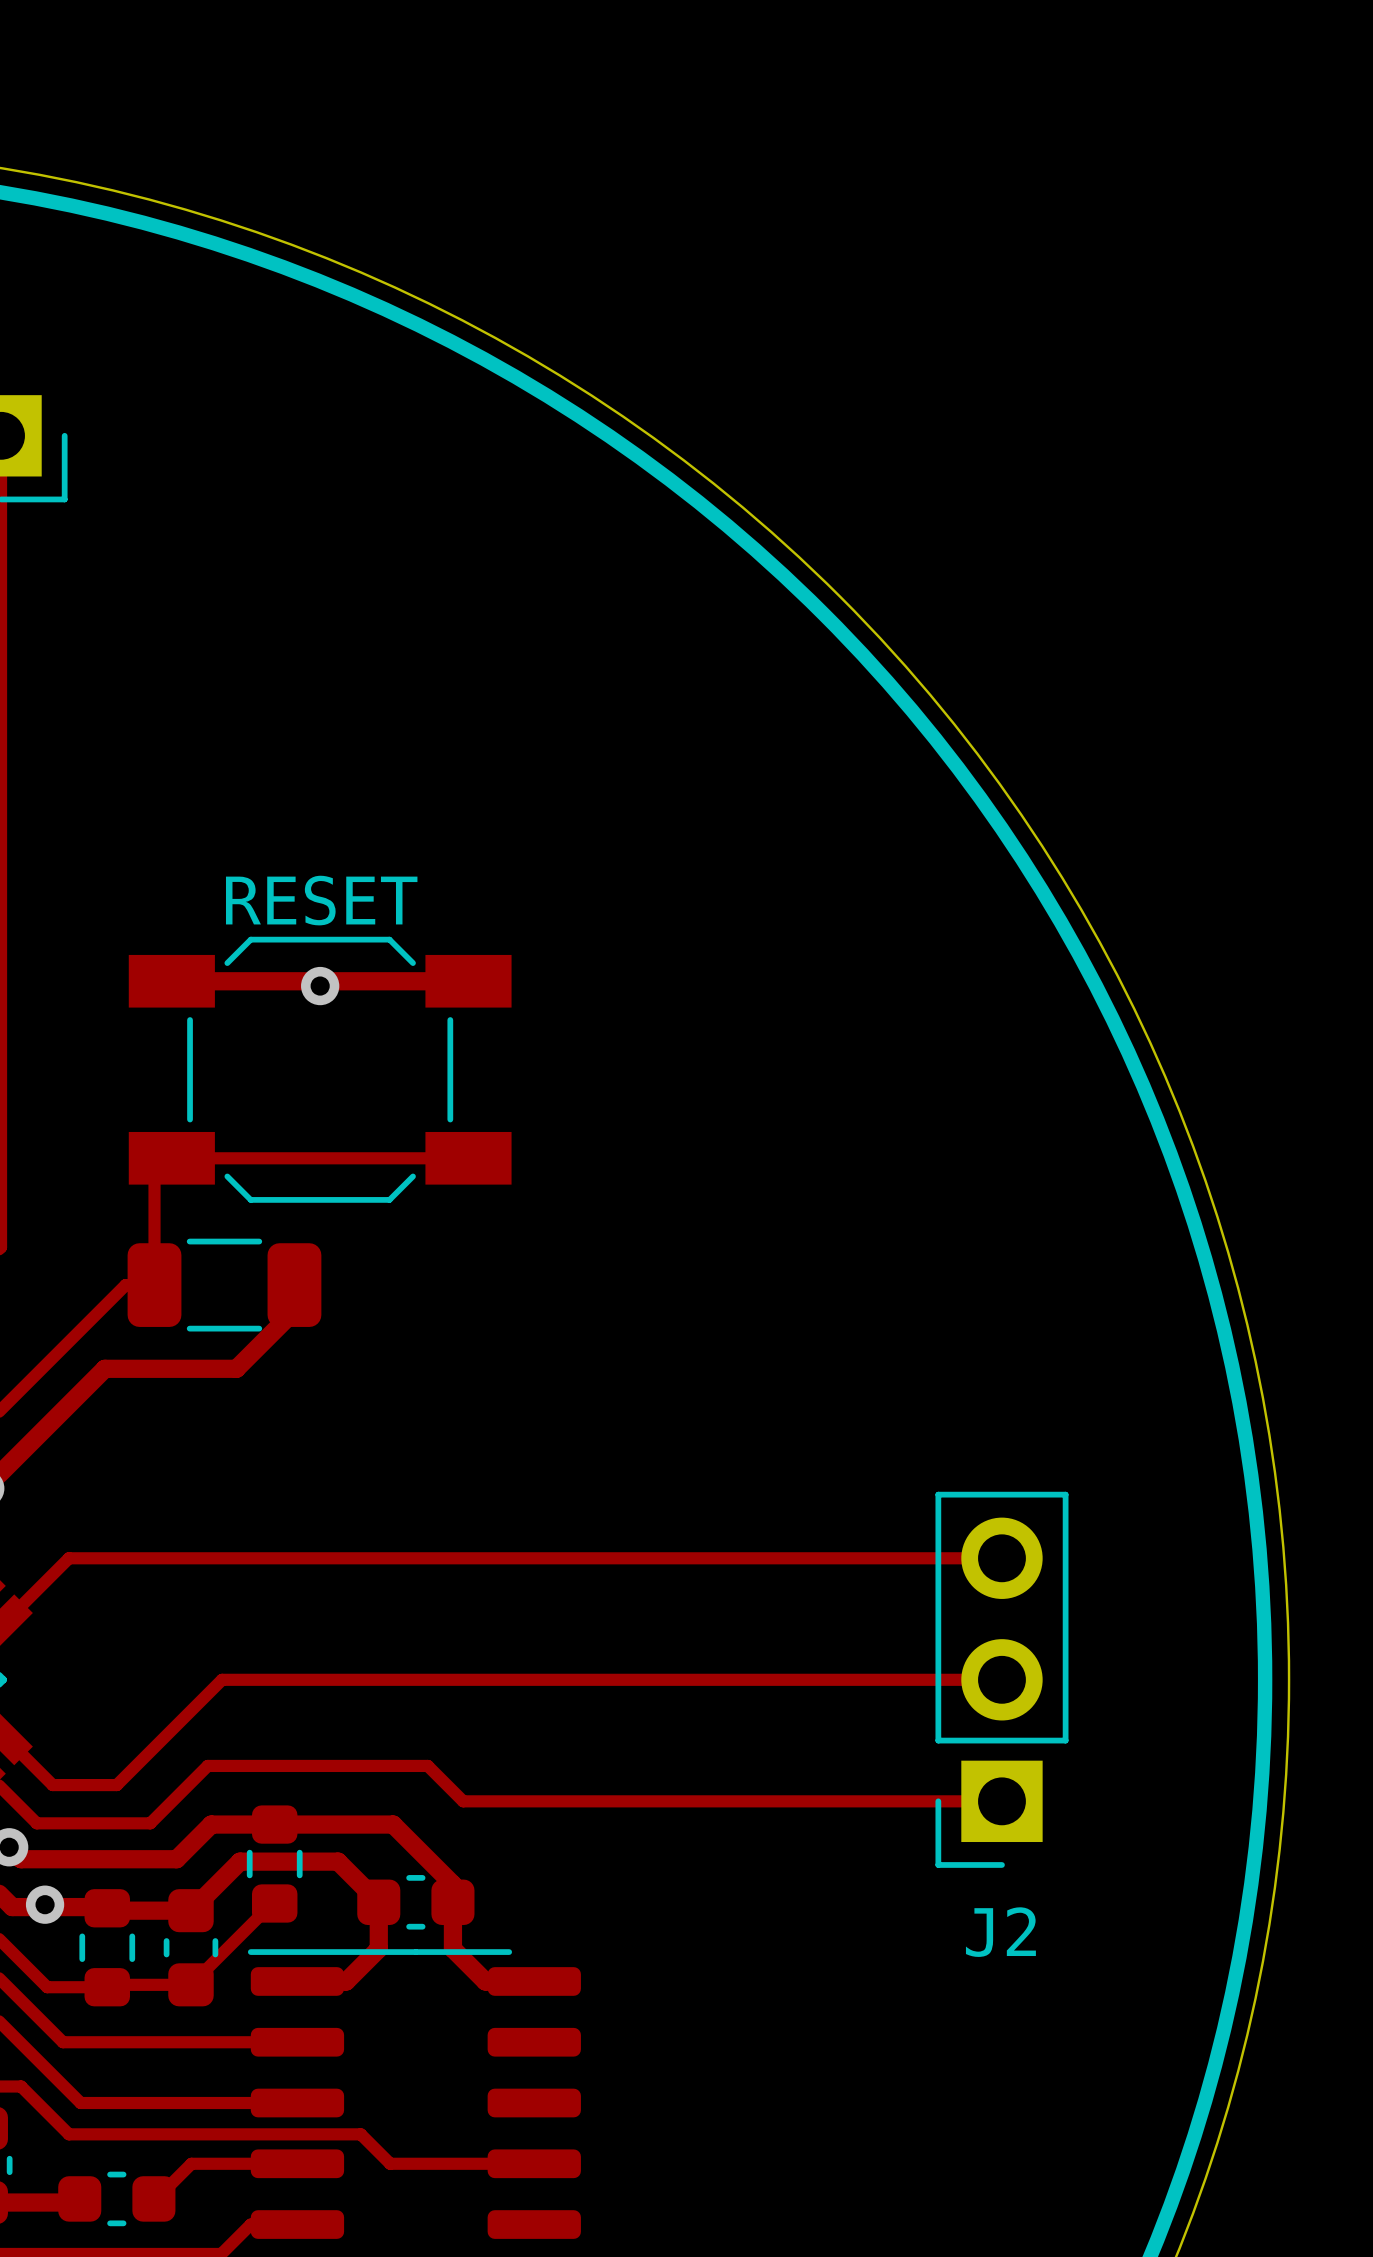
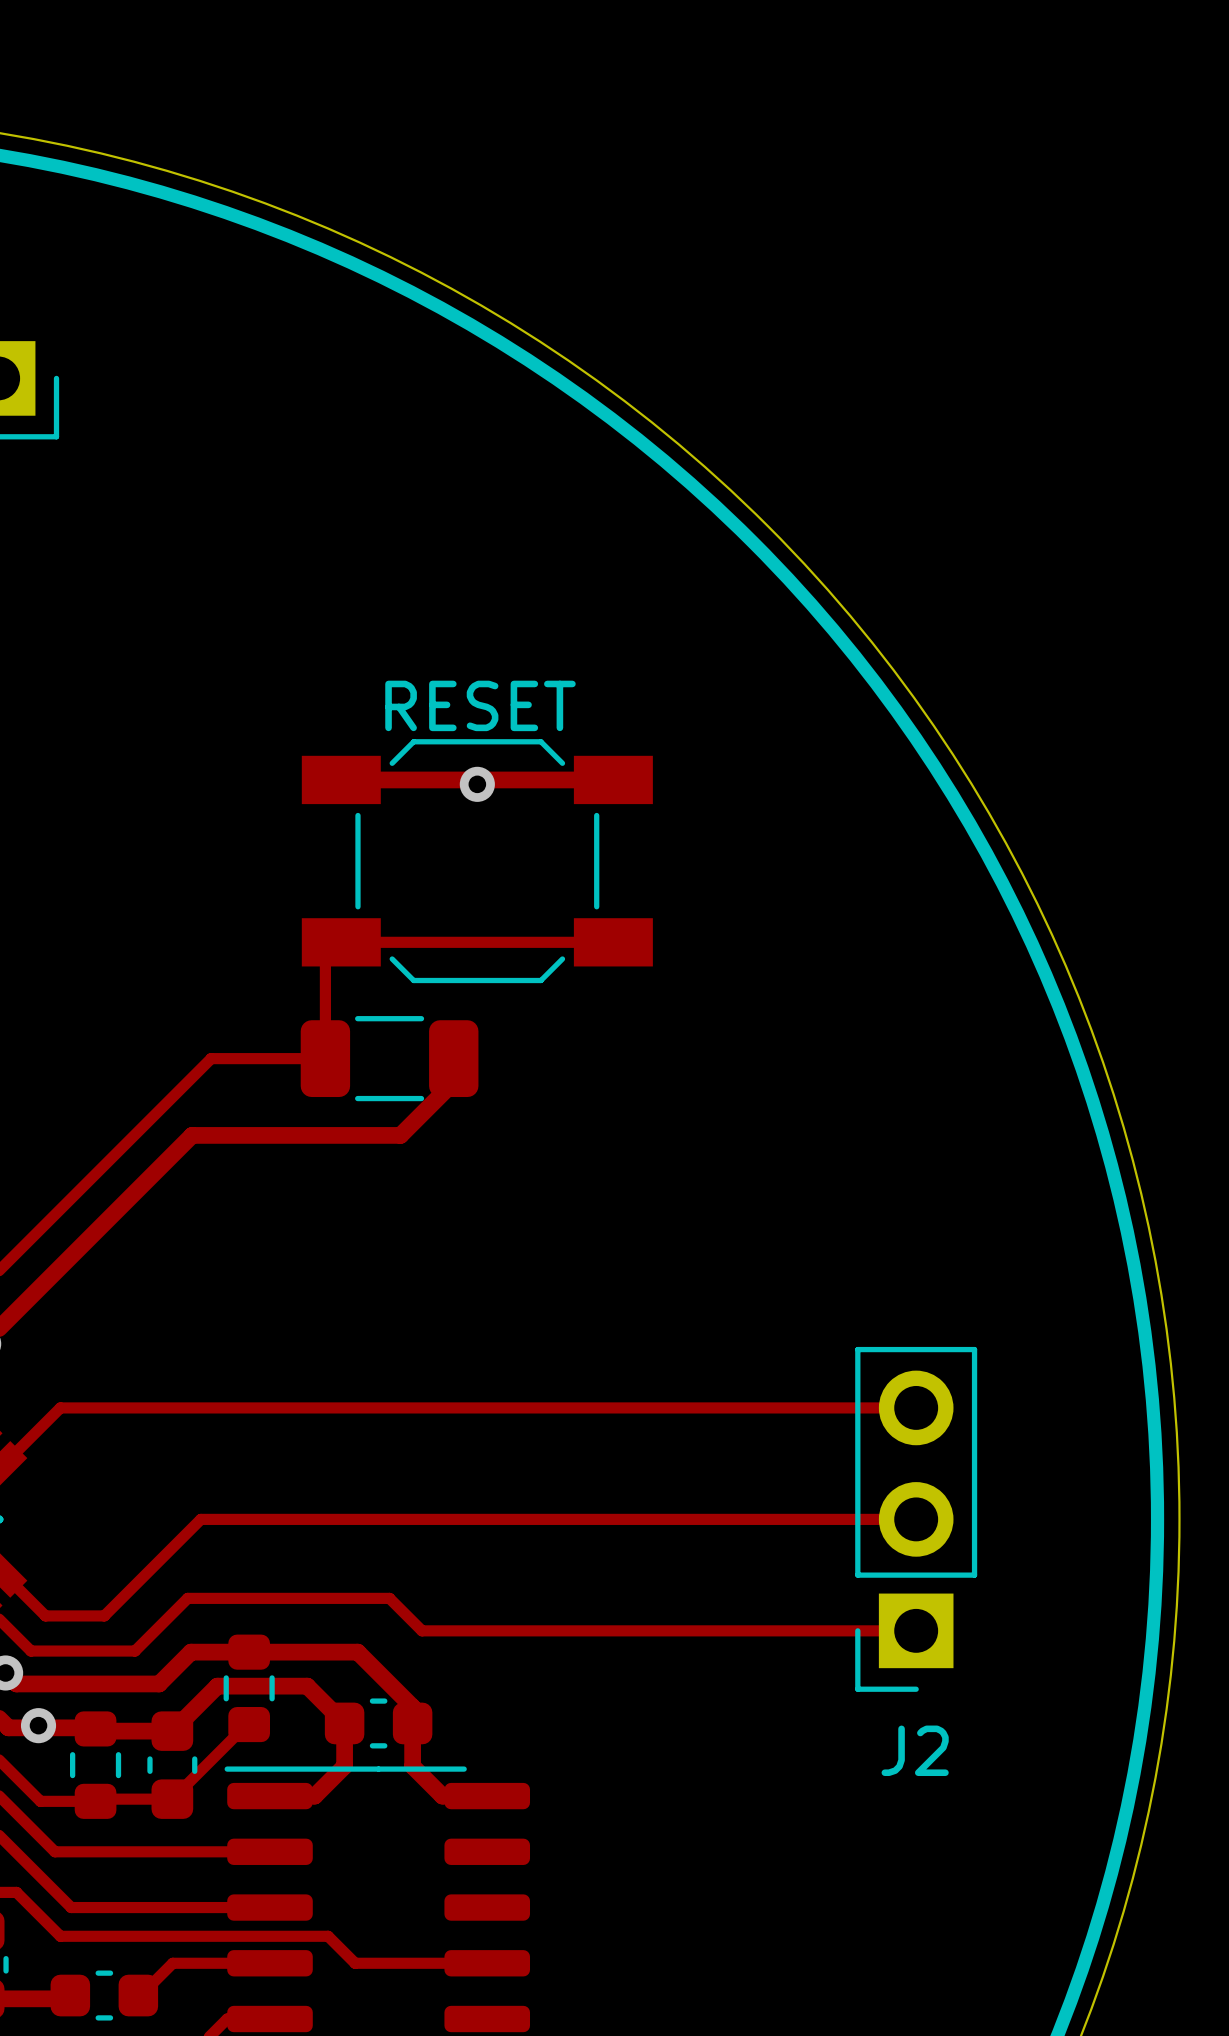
text position: RESET (321, 900) -> RESET (480, 705)
track: (171, 981) (315, 981) (320, 986) (324, 981) (468, 981) -> (341, 779) (472, 779) (477, 784) (481, 779) (613, 779)
via position: (320, 986) -> (477, 784)
part position: (320, 1069) -> (477, 861)
track: (468, 1158) (171, 1158) (154, 1175) (154, 1285) (125, 1285) -> (613, 942) (341, 942) (325, 958) (325, 1058) (211, 1058) (112, 1157)
part position: (224, 1285) -> (389, 1058)
track: (294, 1285) (294, 1310) (236, 1368) (104, 1368) -> (453, 1058) (453, 1082) (400, 1135) (192, 1135) (93, 1234)

